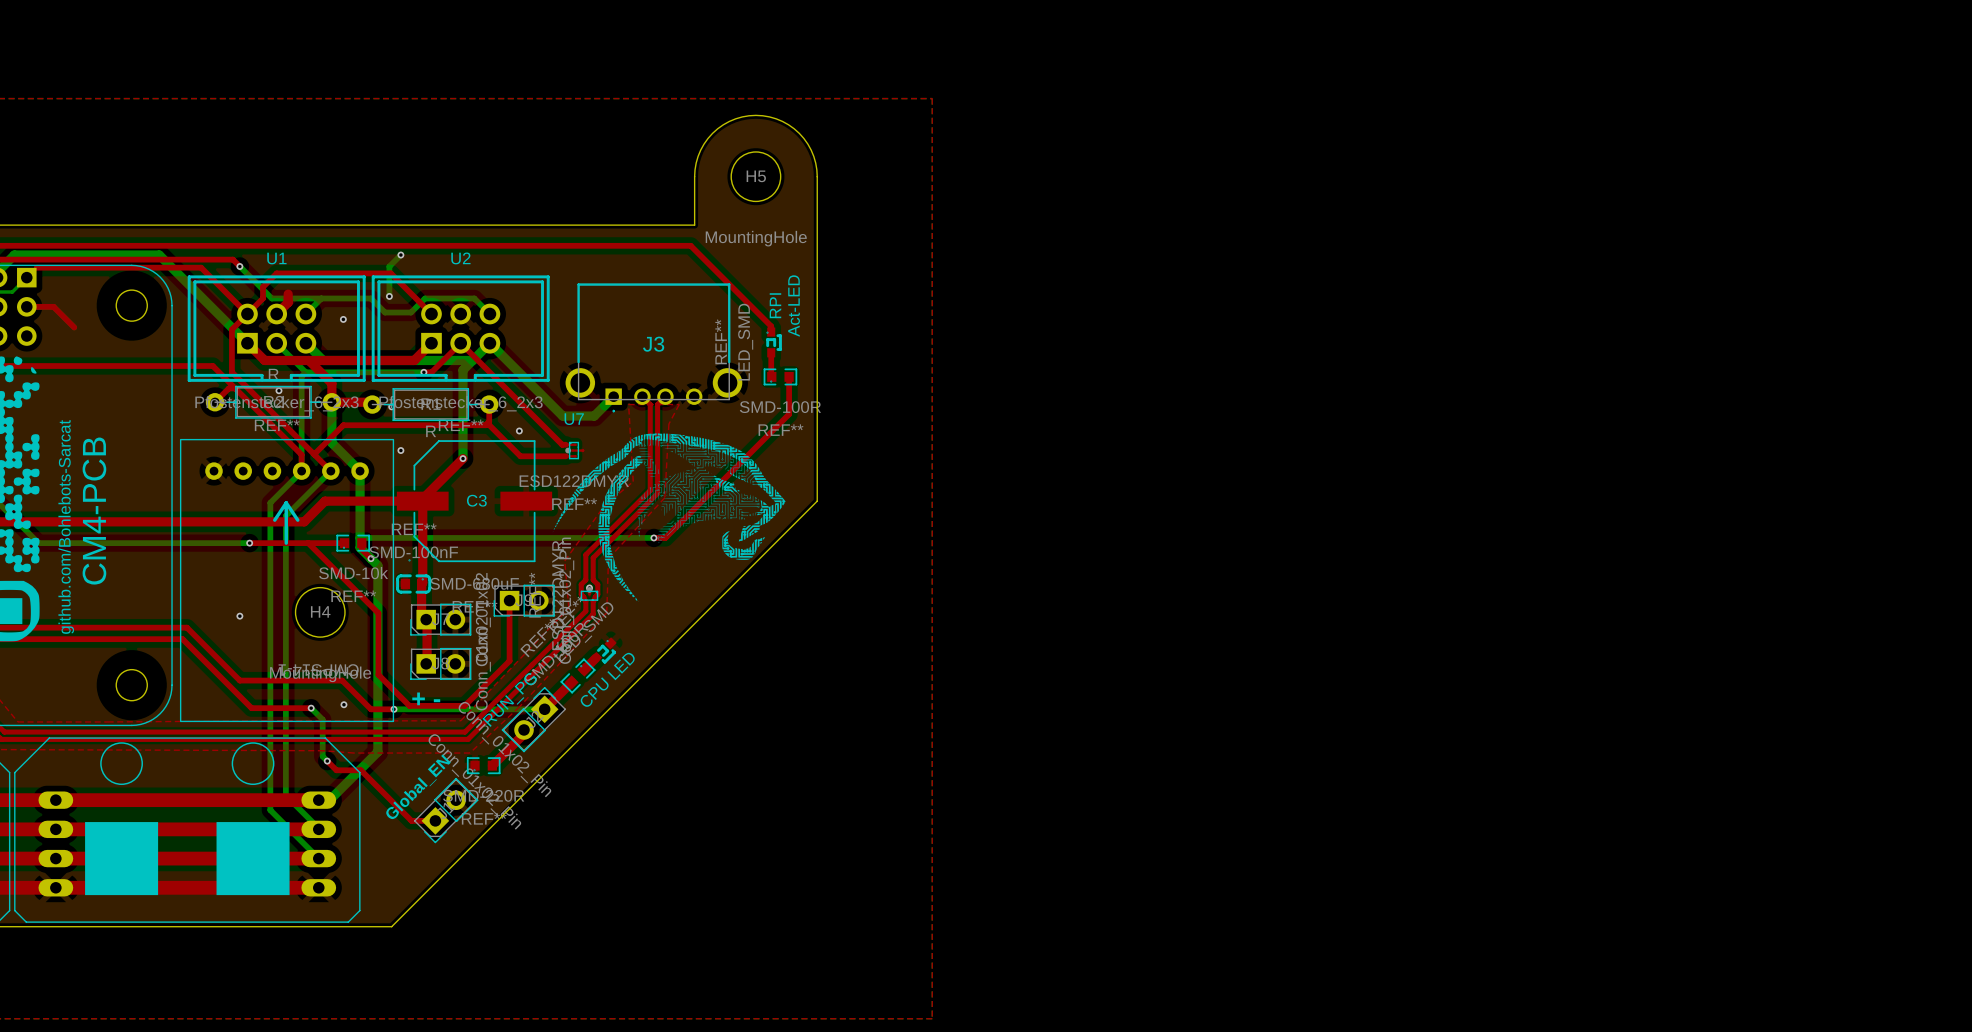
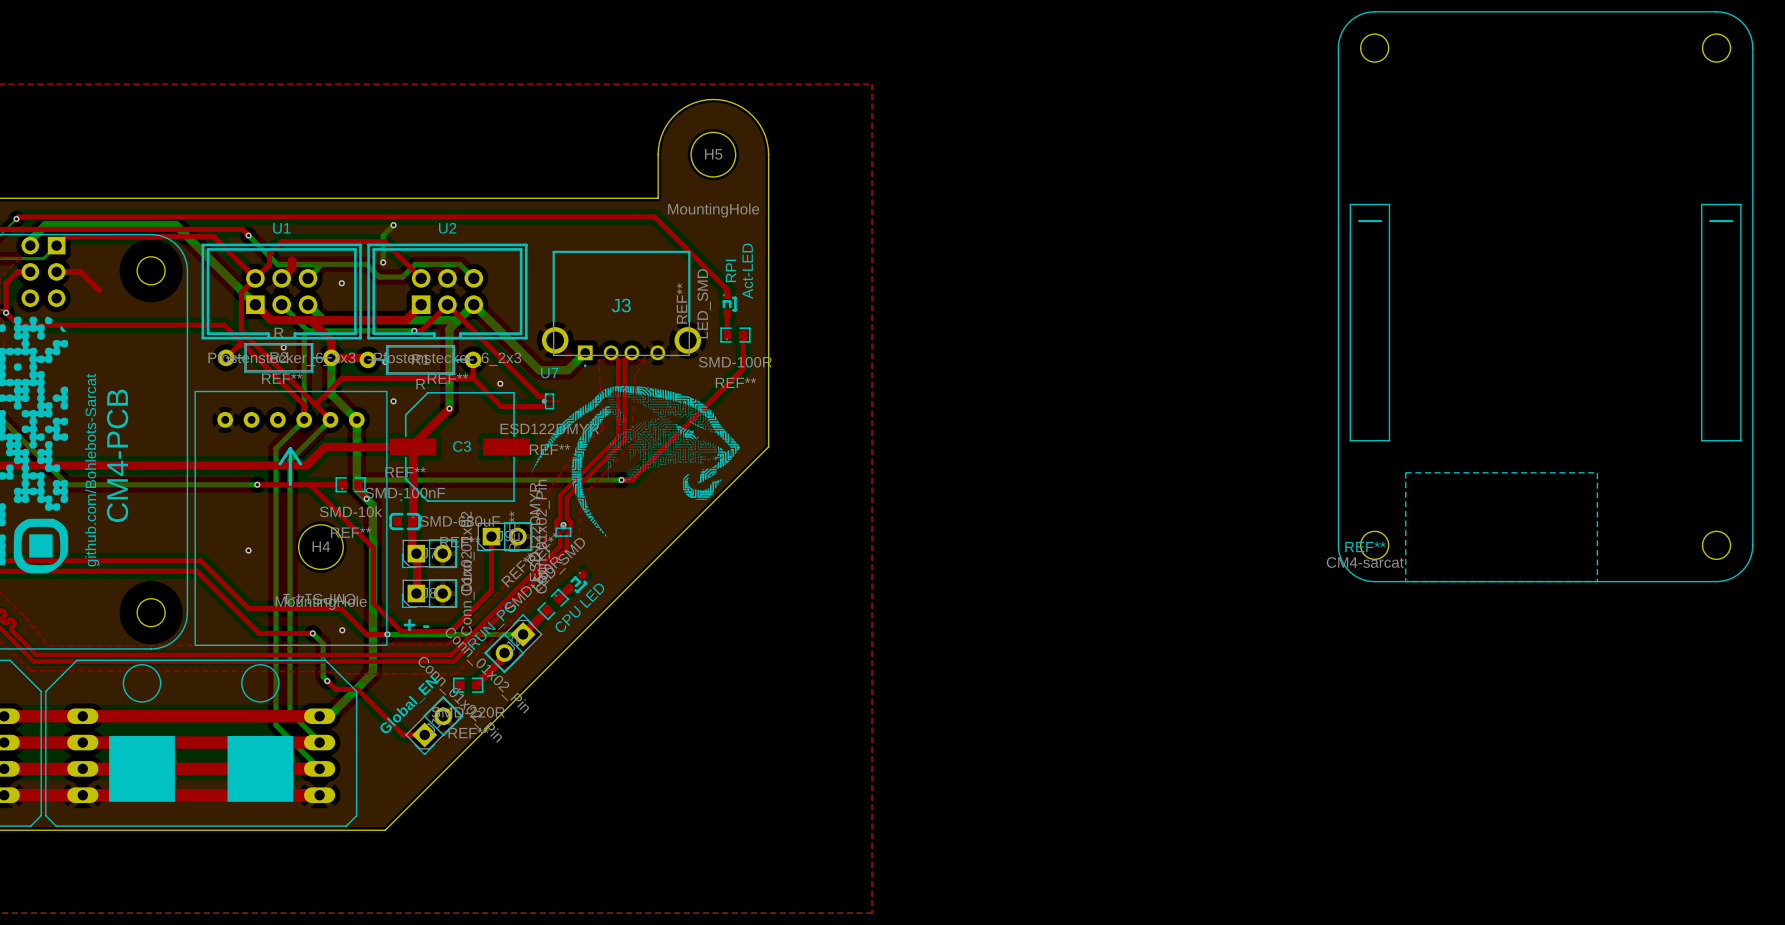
REF**: none -> CM4-sarcat (1545, 296)

